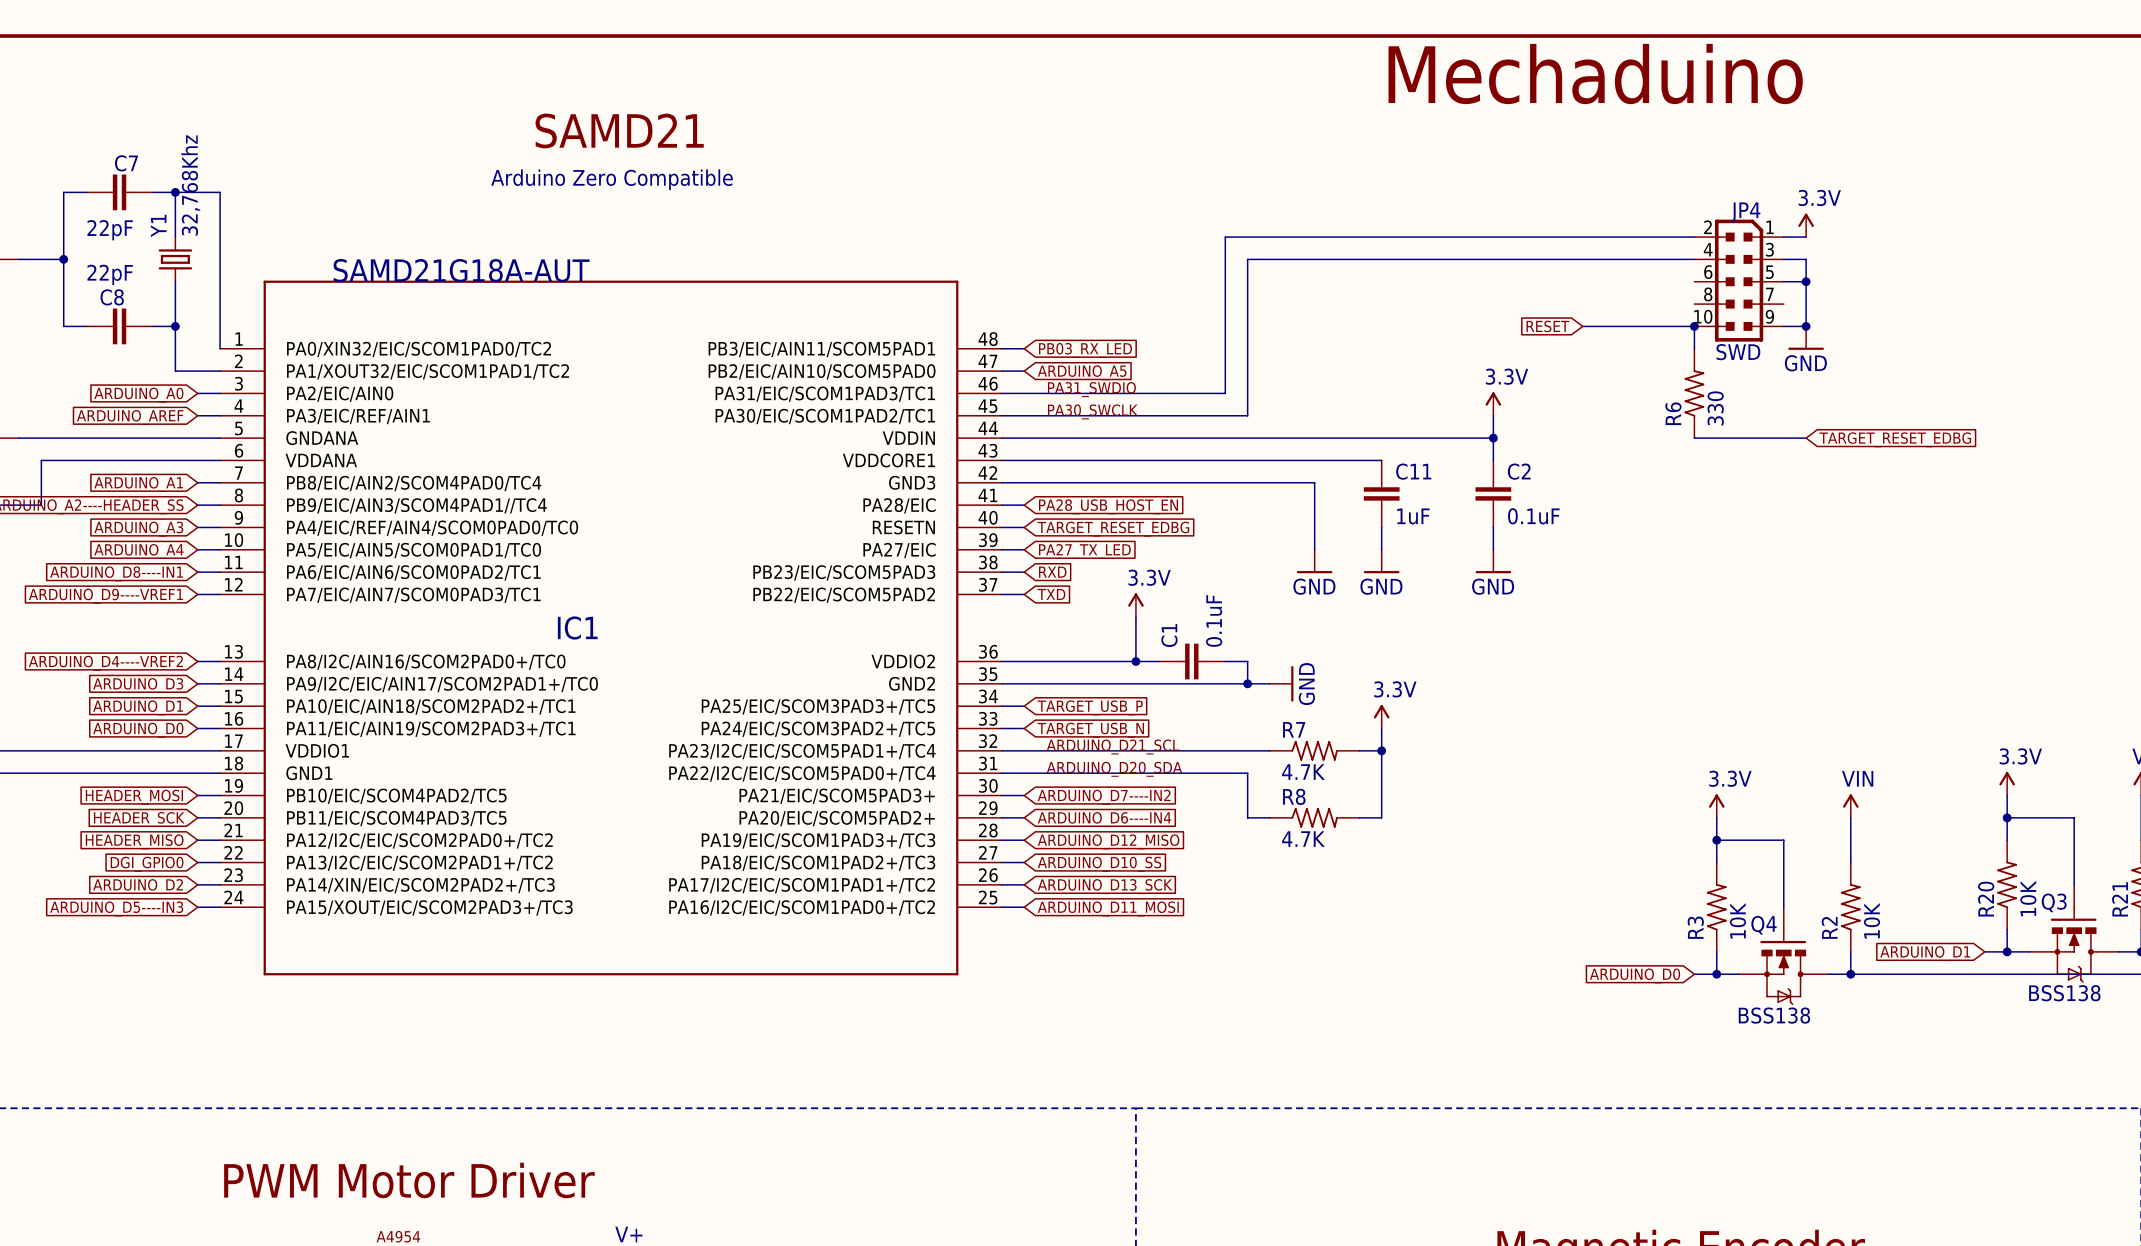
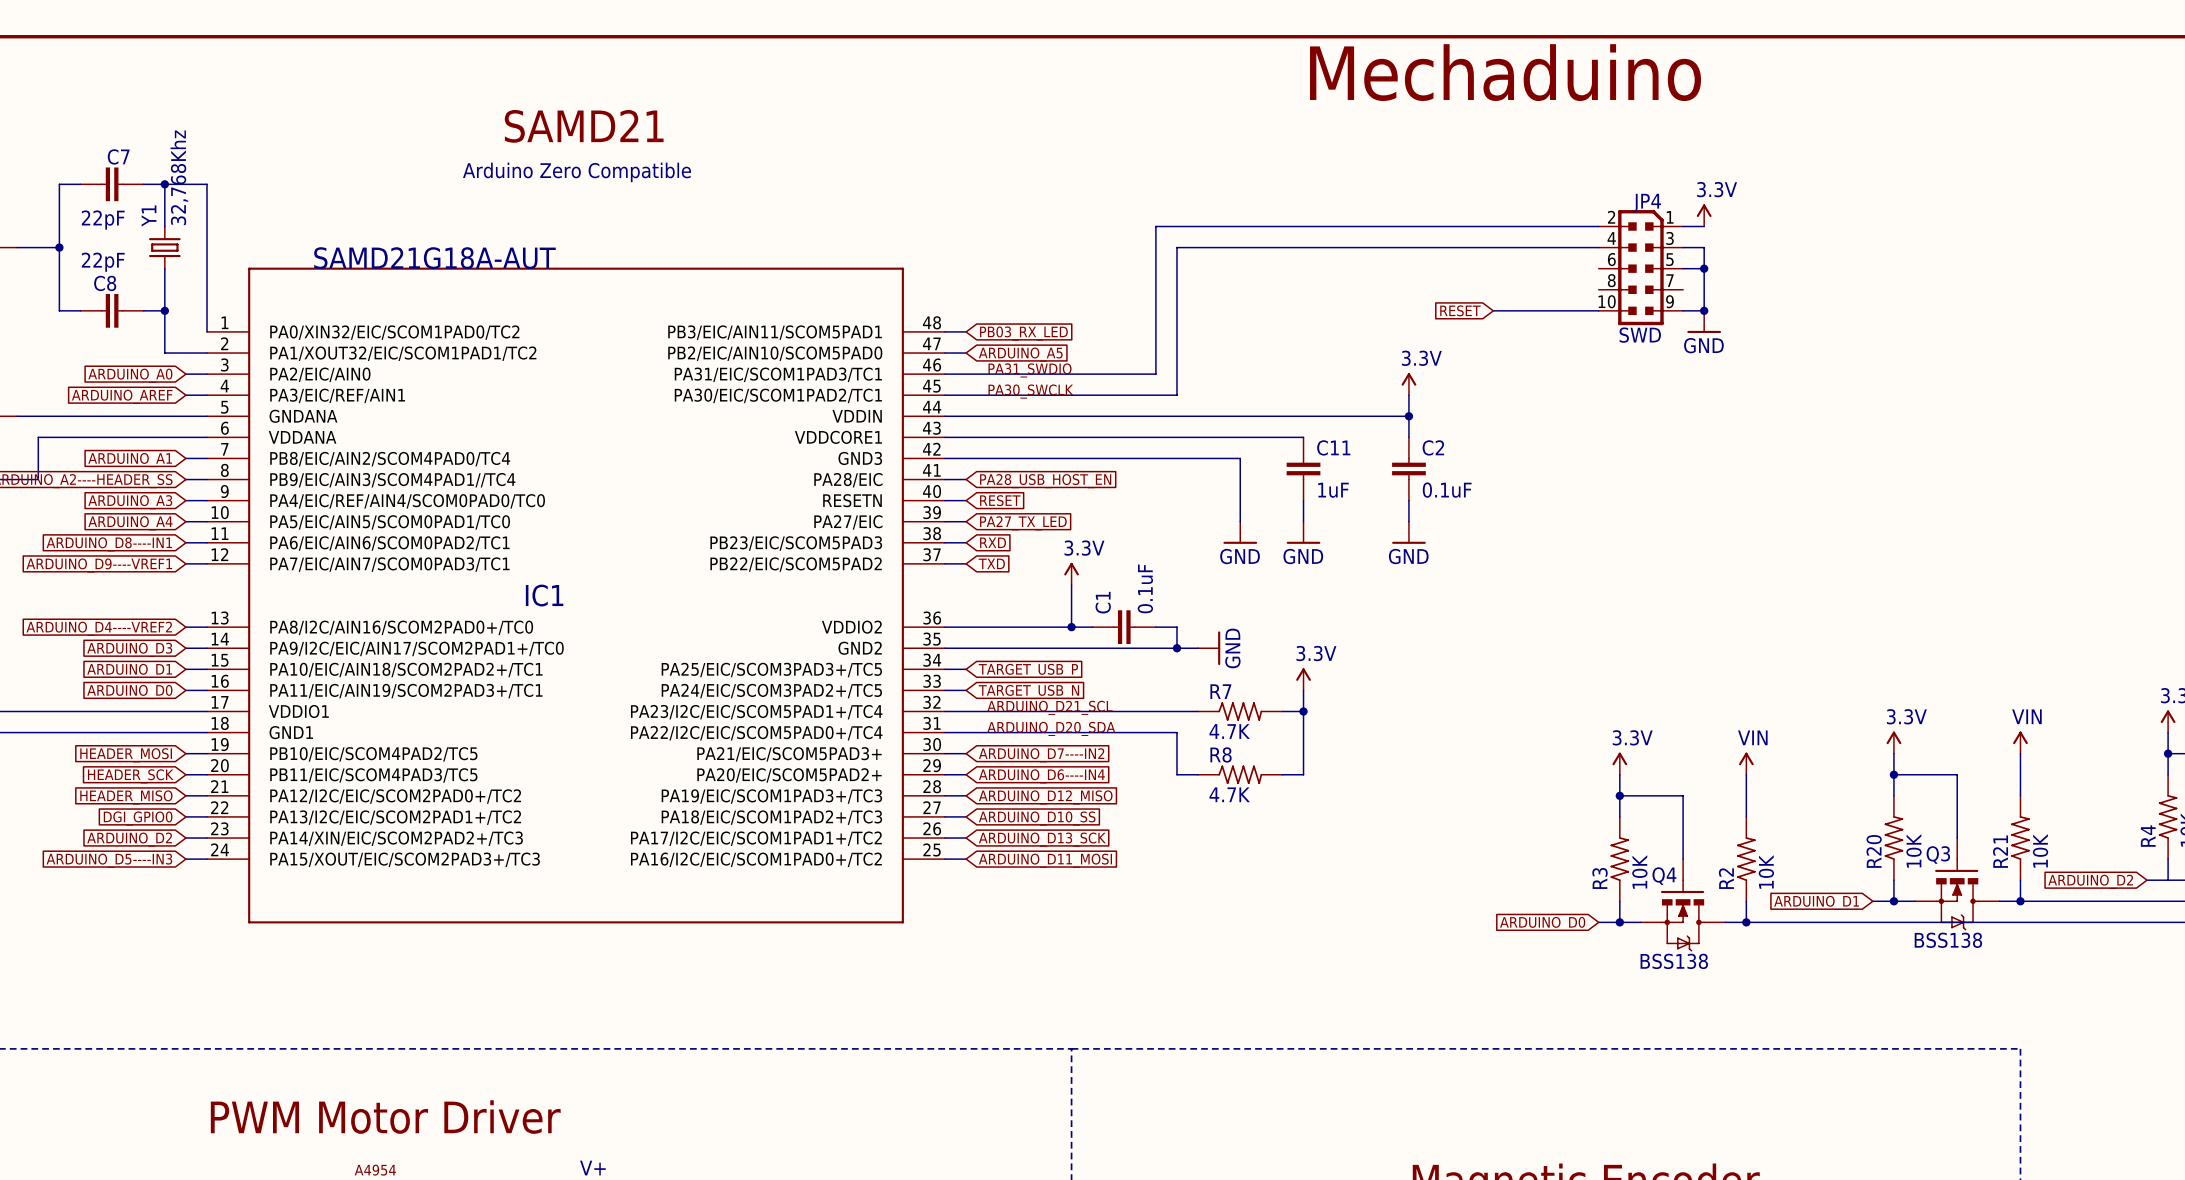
wire: (1694, 326) (1694, 348) -> none
junction: (1694, 326) -> none
R6: 330 (1694, 393) -> none
wire: (1694, 438) (1806, 438) -> none
global label: TARGET_RESET_EDBG (1895, 439) -> none
global label: TARGET_RESET_EDBG (1113, 529) -> RESET (1000, 500)

